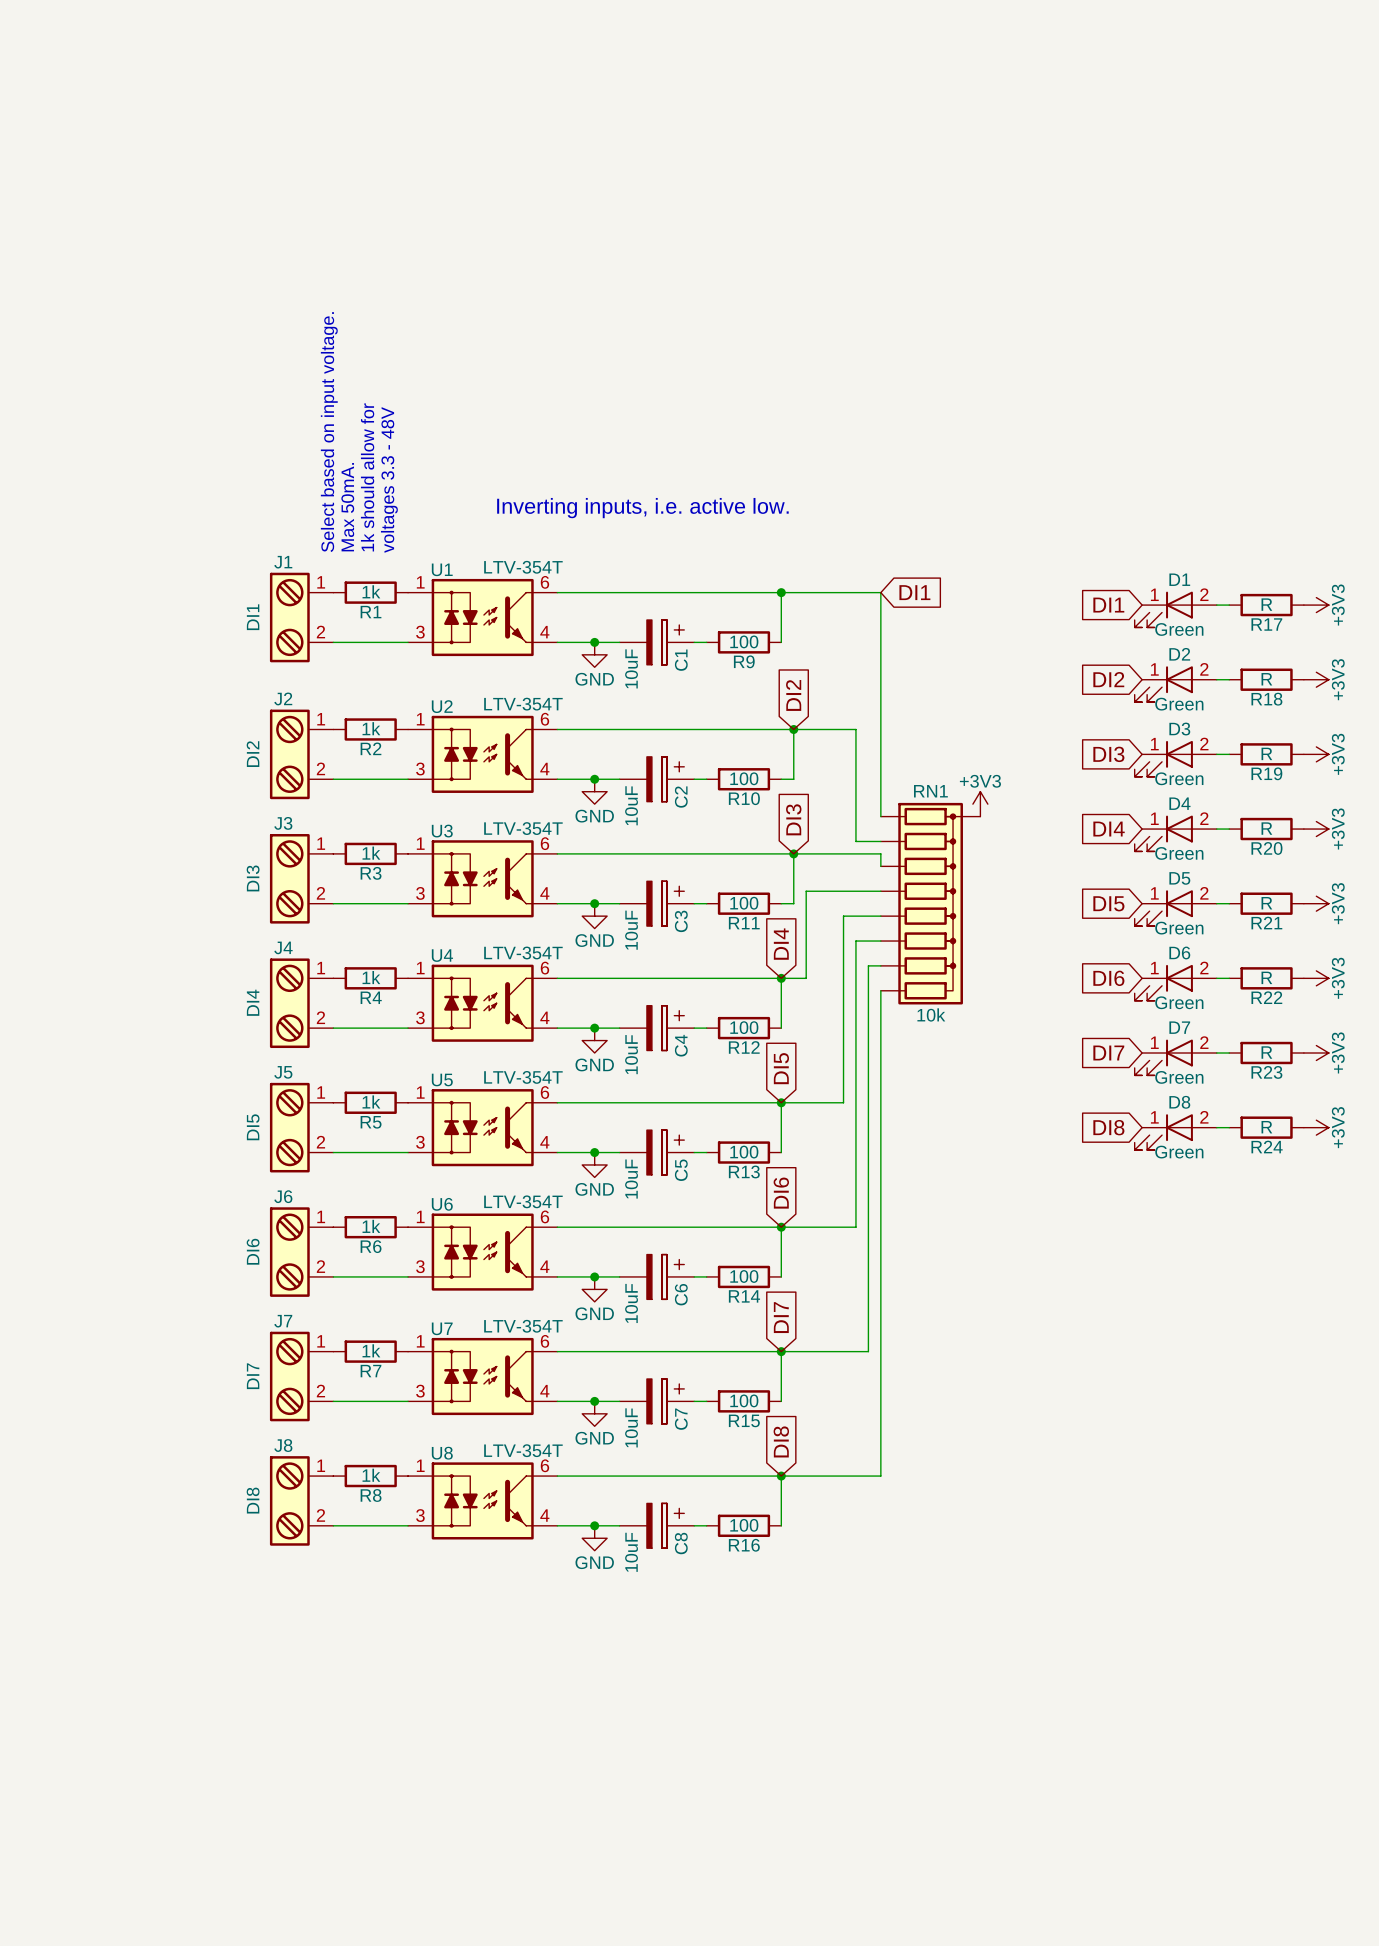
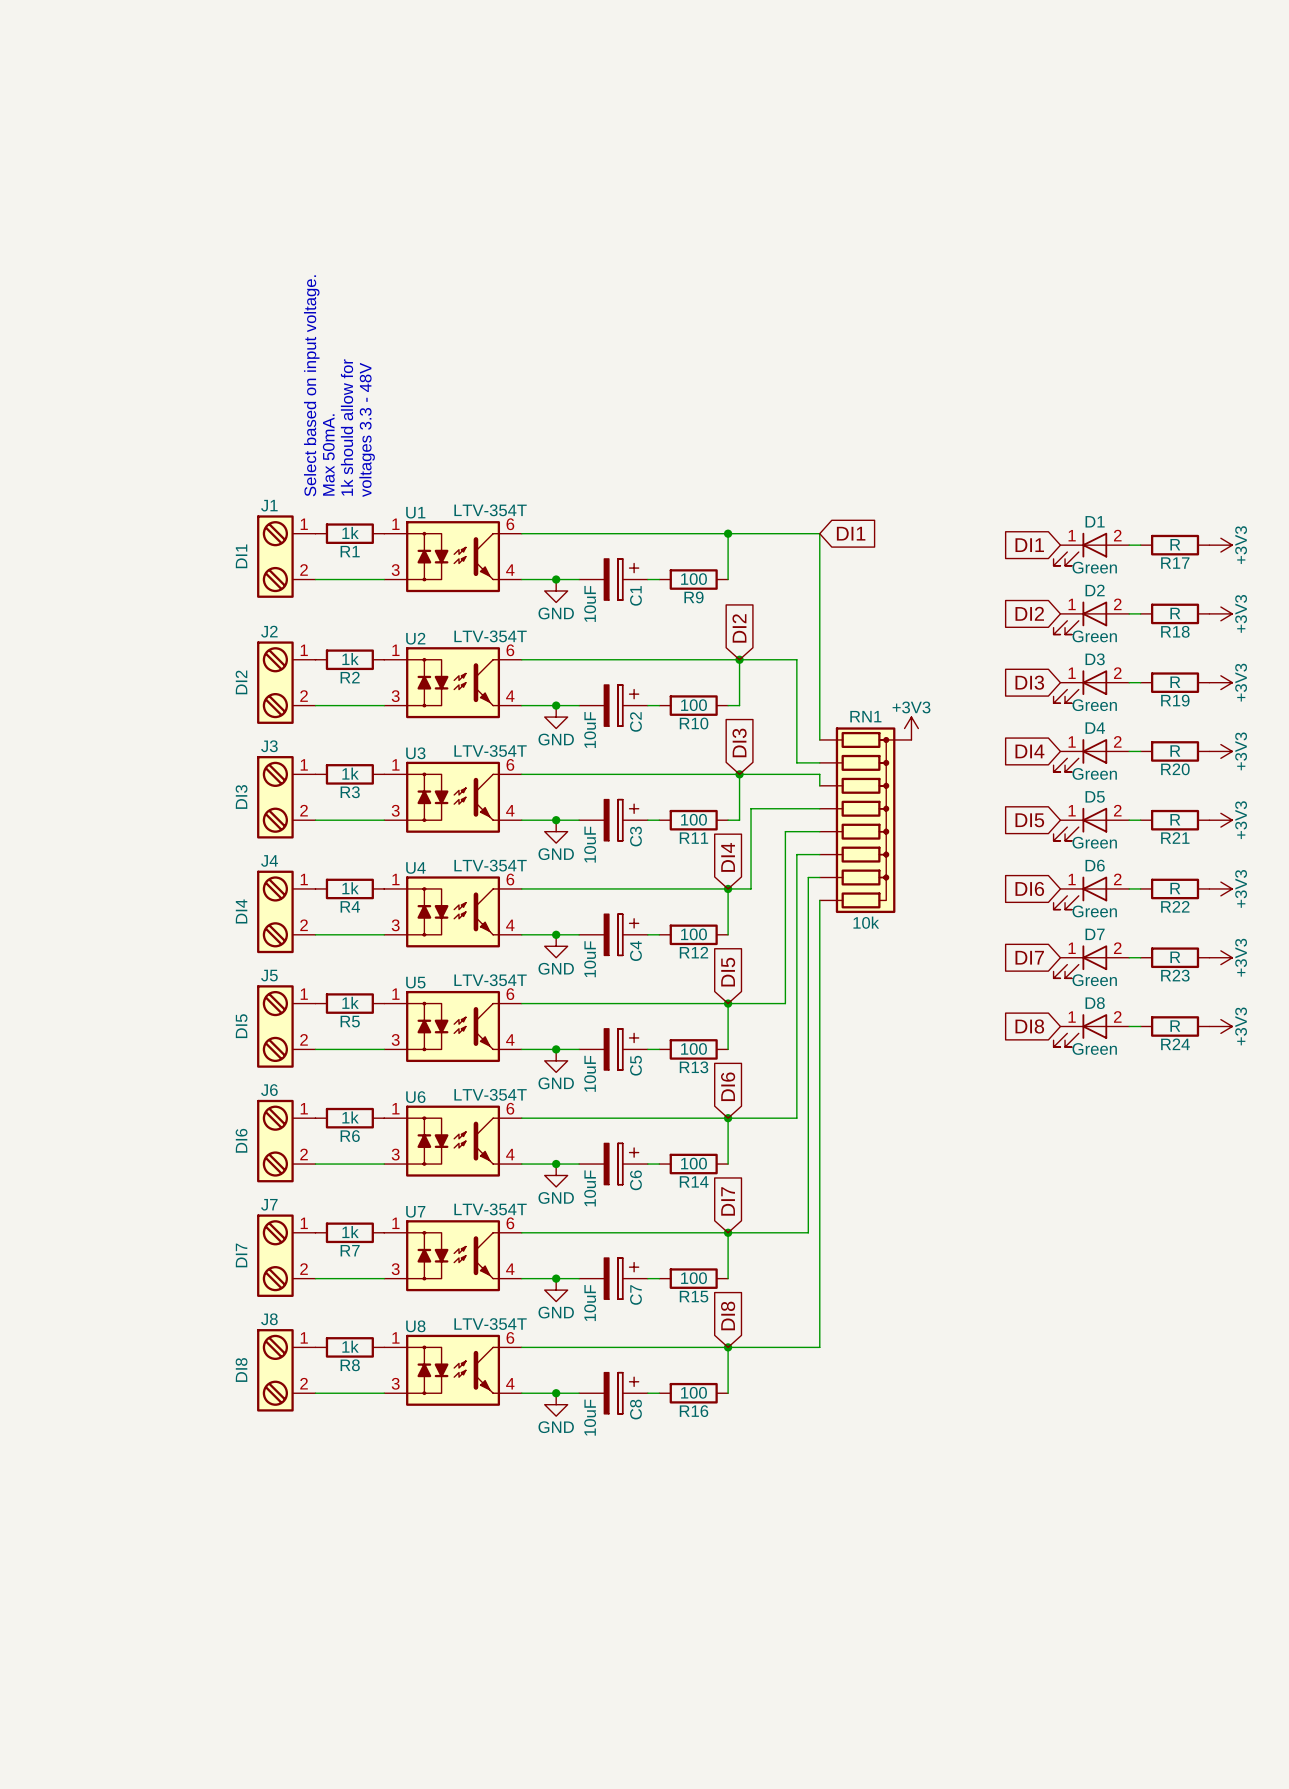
text: Inverting inputs, i.e. active low. (642, 508) -> none

